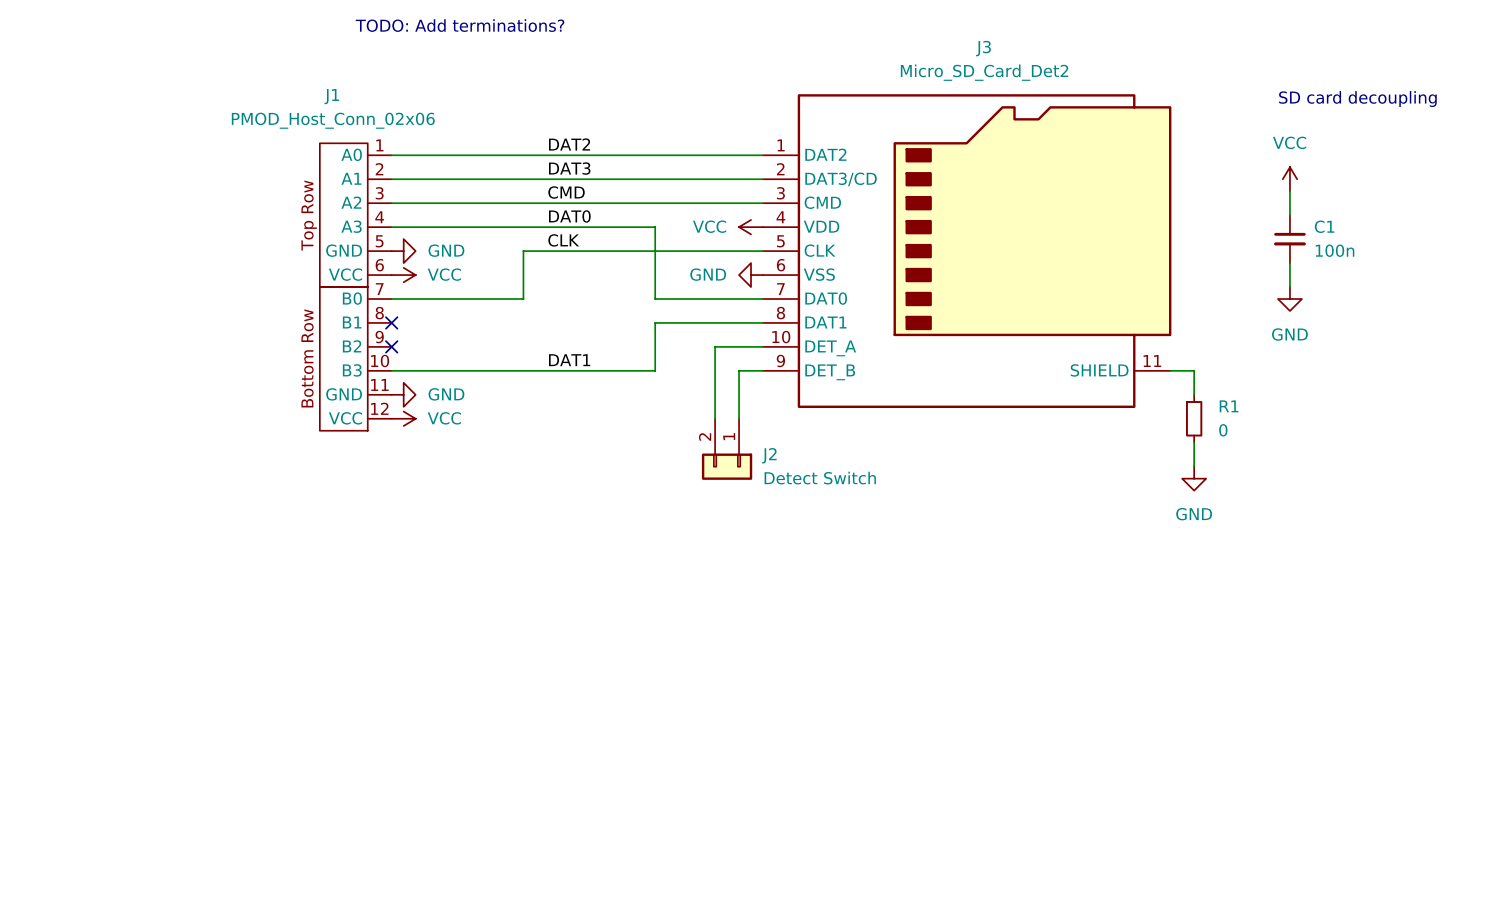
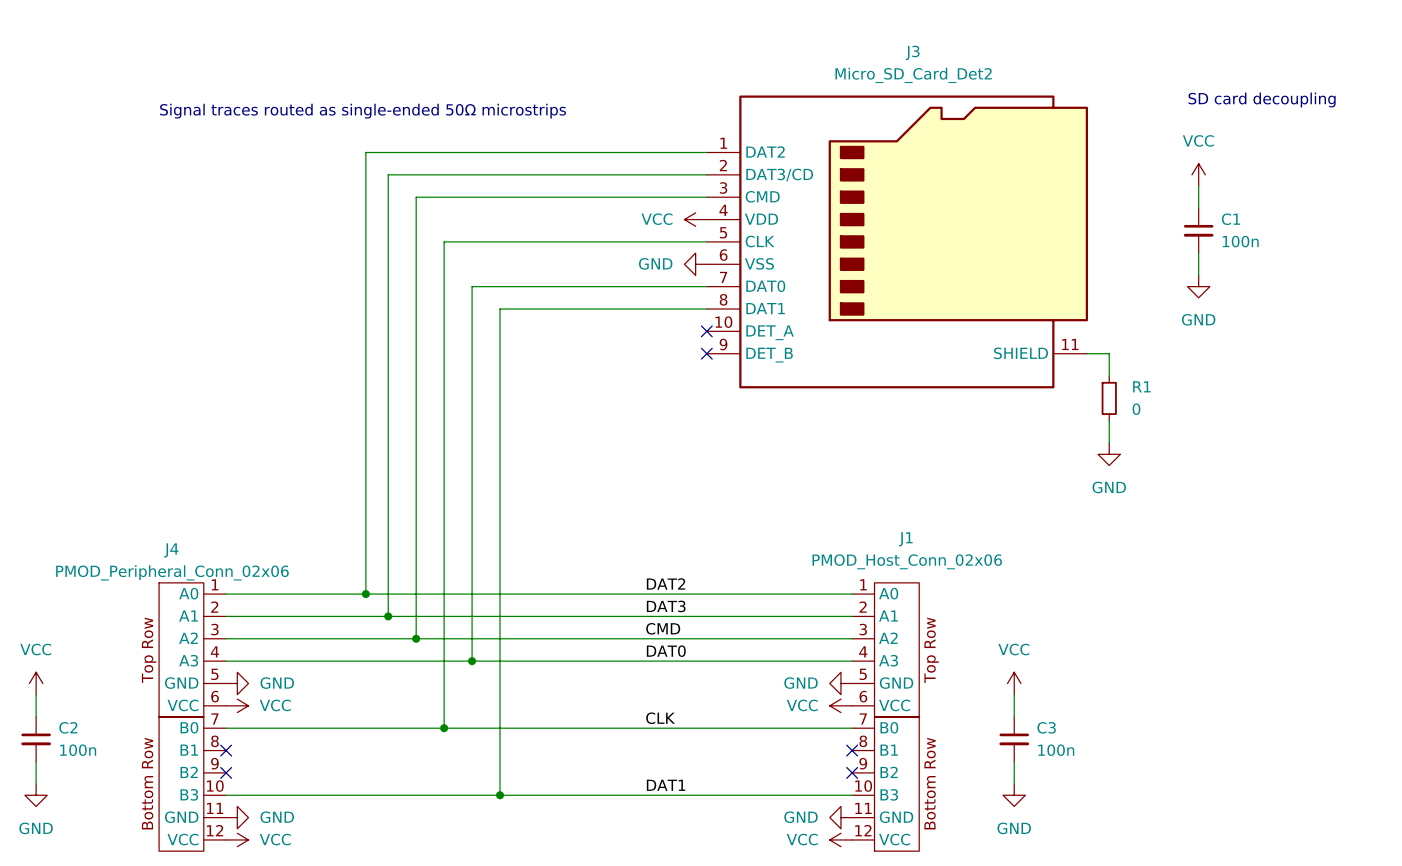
text: TODO: Add terminations? (460, 25) -> none
text: none -> Signal traces routed as single-ended 50Ω microstrips (363, 111)
label: DAT2 (569, 144) -> none
wire: (391, 155) (397, 155) -> (365, 594) (365, 152)
label: DAT3 (569, 168) -> none
wire: (391, 179) (421, 179) -> (388, 616) (388, 174)
label: CMD (566, 192) -> none
wire: (391, 203) (451, 203) -> (416, 638) (416, 197)
label: DAT0 (569, 216) -> none
wire: (391, 227) (655, 227) (655, 299) -> none
label: CLK (563, 240) -> none
power symbol: GND (403, 251) -> none
wire: (523, 251) (523, 299) -> (606, 286) (483, 286)
wire: none -> (483, 241) (444, 241) (444, 728)
power symbol: VCC (403, 275) -> none
J1 flip: as is (343, 287) -> left-right (896, 717)
J1 position: (355, 287) -> (885, 717)
wire: (391, 299) (511, 299) -> (472, 661) (472, 286)
no-connect mark: (391, 322) -> none
wire: (655, 322) (655, 370) (391, 370) -> (606, 309) (500, 309) (500, 795)
no-connect mark: (391, 346) -> none
wire: (762, 346) (715, 346) (715, 418) -> none
no-connect mark: none -> (706, 331)
label: DAT1 (569, 360) -> none
wire: (762, 370) (739, 370) (739, 418) -> none
no-connect mark: none -> (706, 353)
power symbol: GND (403, 394) -> none
power symbol: VCC (403, 418) -> none
J2: Detect Switch (727, 449) -> none
label: none -> DAT2 (666, 583)
wire: none -> (226, 594) (852, 594)
junction: none -> (365, 594)
label: none -> DAT3 (666, 606)
wire: none -> (226, 616) (852, 616)
junction: none -> (388, 616)
label: none -> CMD (663, 628)
wire: none -> (226, 638) (852, 638)
junction: none -> (416, 638)
label: none -> DAT0 (666, 651)
wire: none -> (226, 661) (852, 661)
junction: none -> (472, 661)
power symbol: none -> VCC (36, 683)
power symbol: none -> GND (237, 683)
power symbol: none -> GND (840, 683)
power symbol: none -> VCC (1014, 683)
wire: none -> (36, 694) (36, 717)
wire: none -> (1014, 694) (1014, 717)
power symbol: none -> VCC (237, 705)
power symbol: none -> VCC (840, 705)
J4: none -> PMOD_Peripheral_Conn_02x06 (192, 717)
label: none -> CLK (660, 718)
wire: none -> (226, 728) (852, 728)
junction: none -> (444, 728)
C2: none -> 100n (36, 739)
C3: none -> 100n (1014, 739)
no-connect mark: none -> (226, 750)
no-connect mark: none -> (852, 750)
wire: none -> (36, 761) (36, 784)
wire: none -> (1014, 761) (1014, 784)
no-connect mark: none -> (226, 772)
no-connect mark: none -> (852, 772)
label: none -> DAT1 (666, 785)
power symbol: none -> GND (36, 795)
wire: none -> (226, 795) (852, 795)
junction: none -> (500, 795)
power symbol: none -> GND (1014, 795)
power symbol: none -> GND (237, 817)
power symbol: none -> GND (840, 817)
power symbol: none -> VCC (237, 839)
power symbol: none -> VCC (840, 839)

